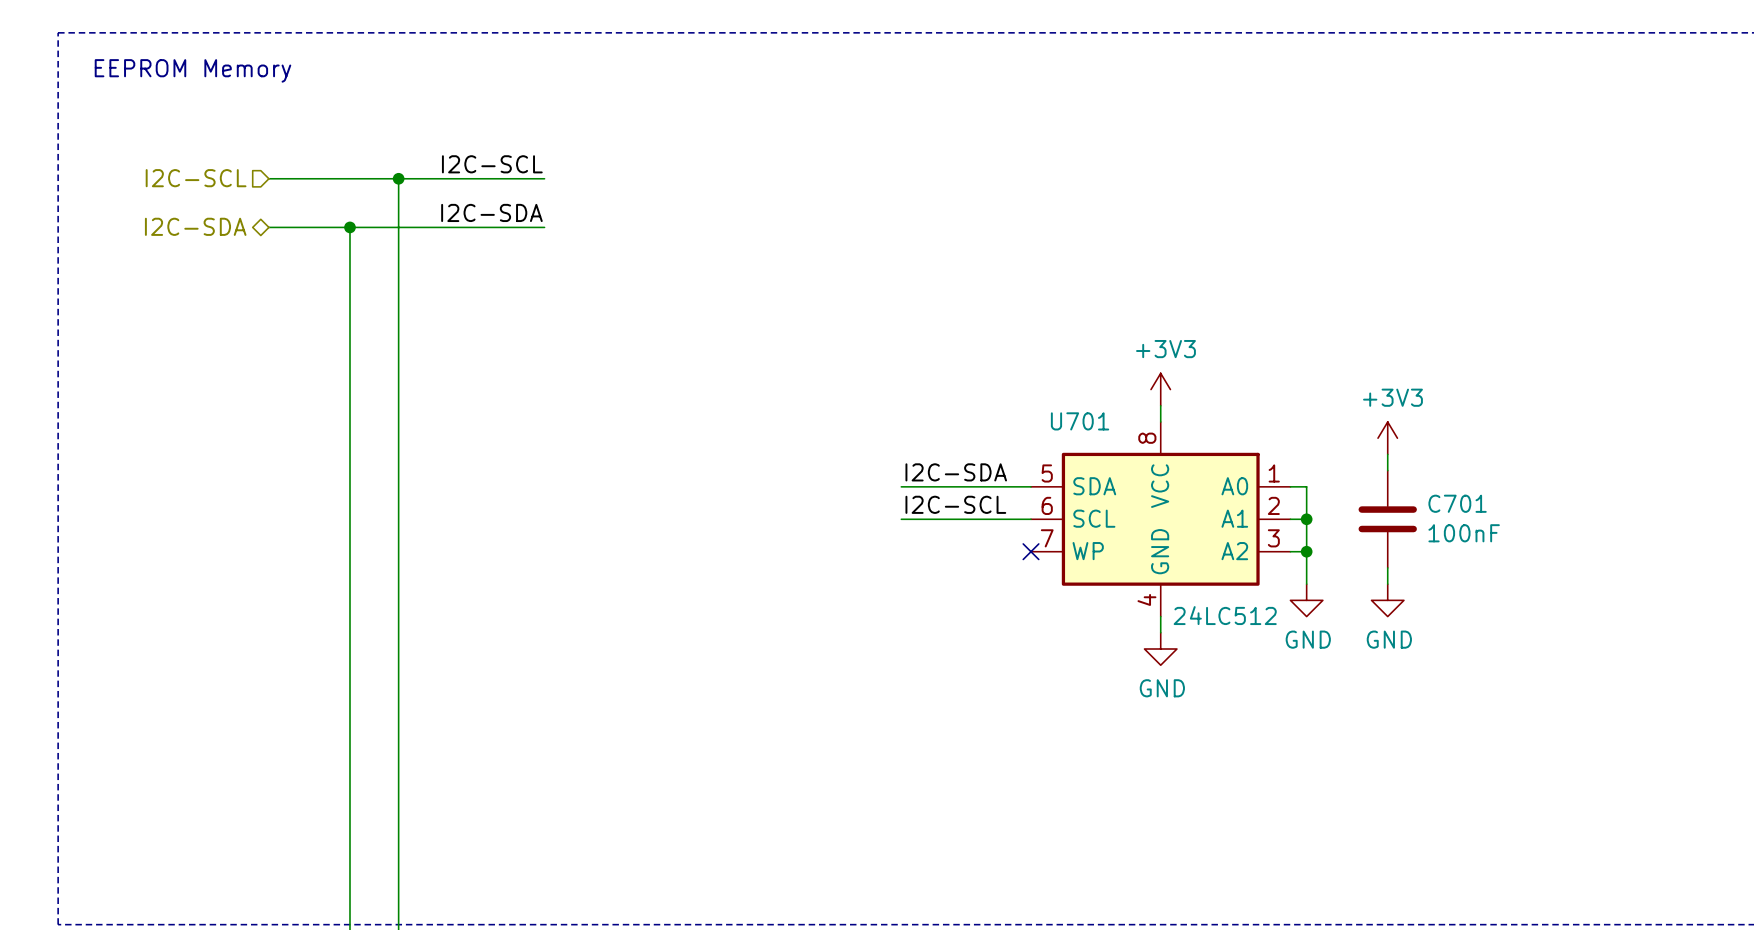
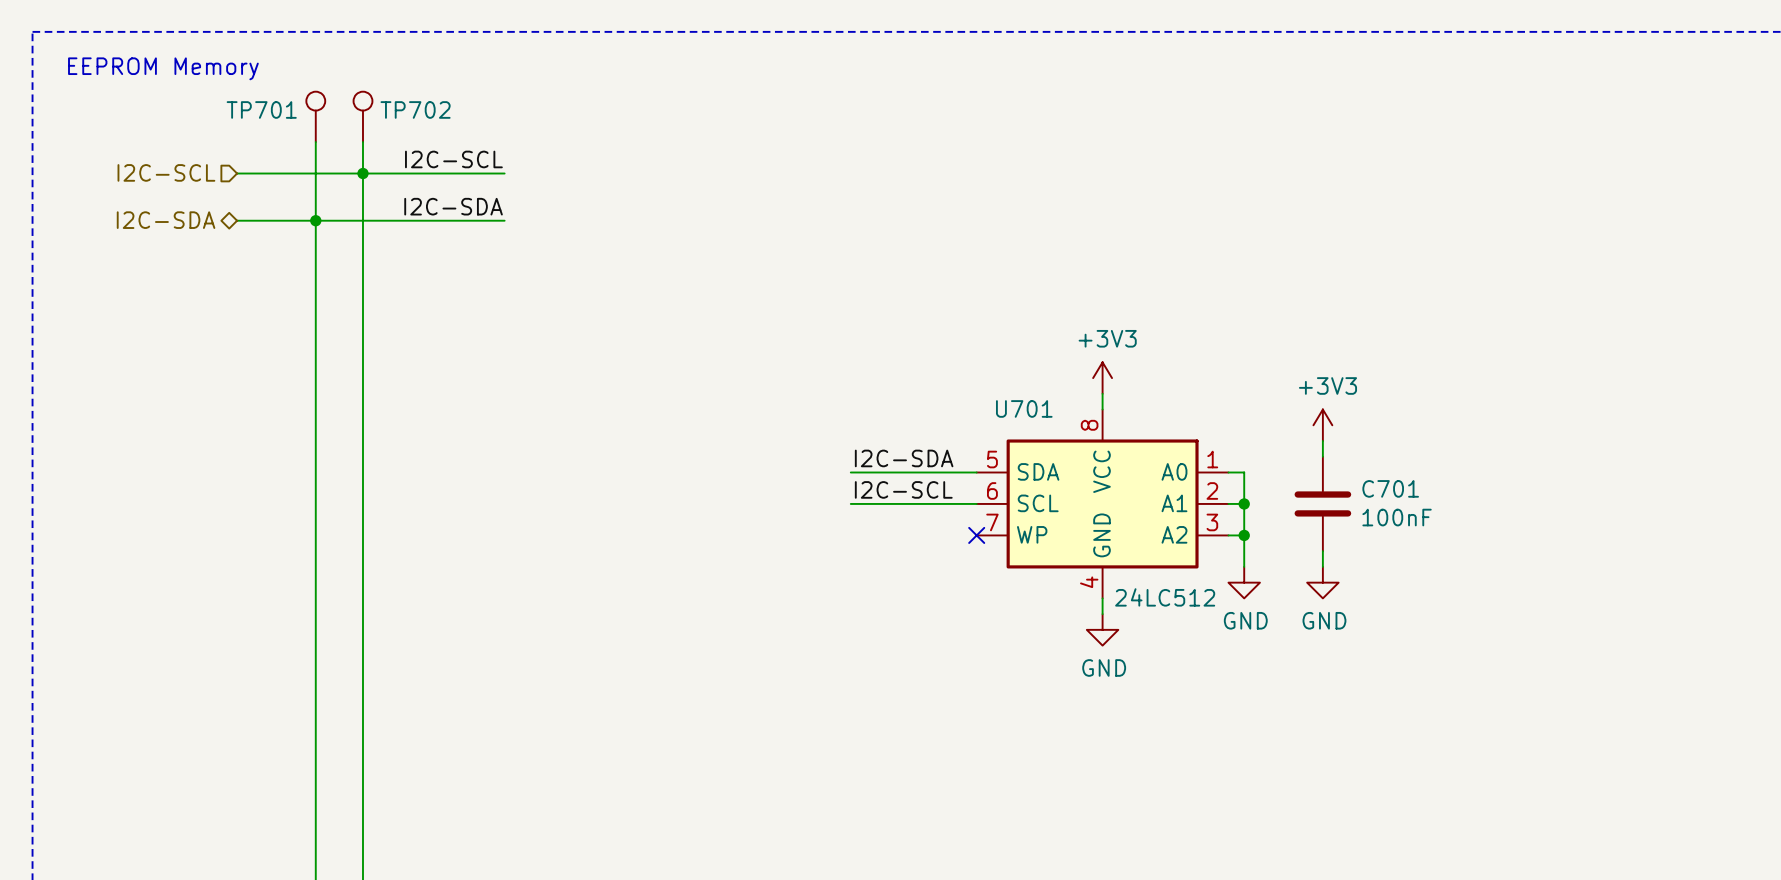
TP701: none -> (315, 116)
TP702: none -> (362, 116)
wire: none -> (315, 142) (315, 220)
wire: none -> (362, 142) (362, 173)

